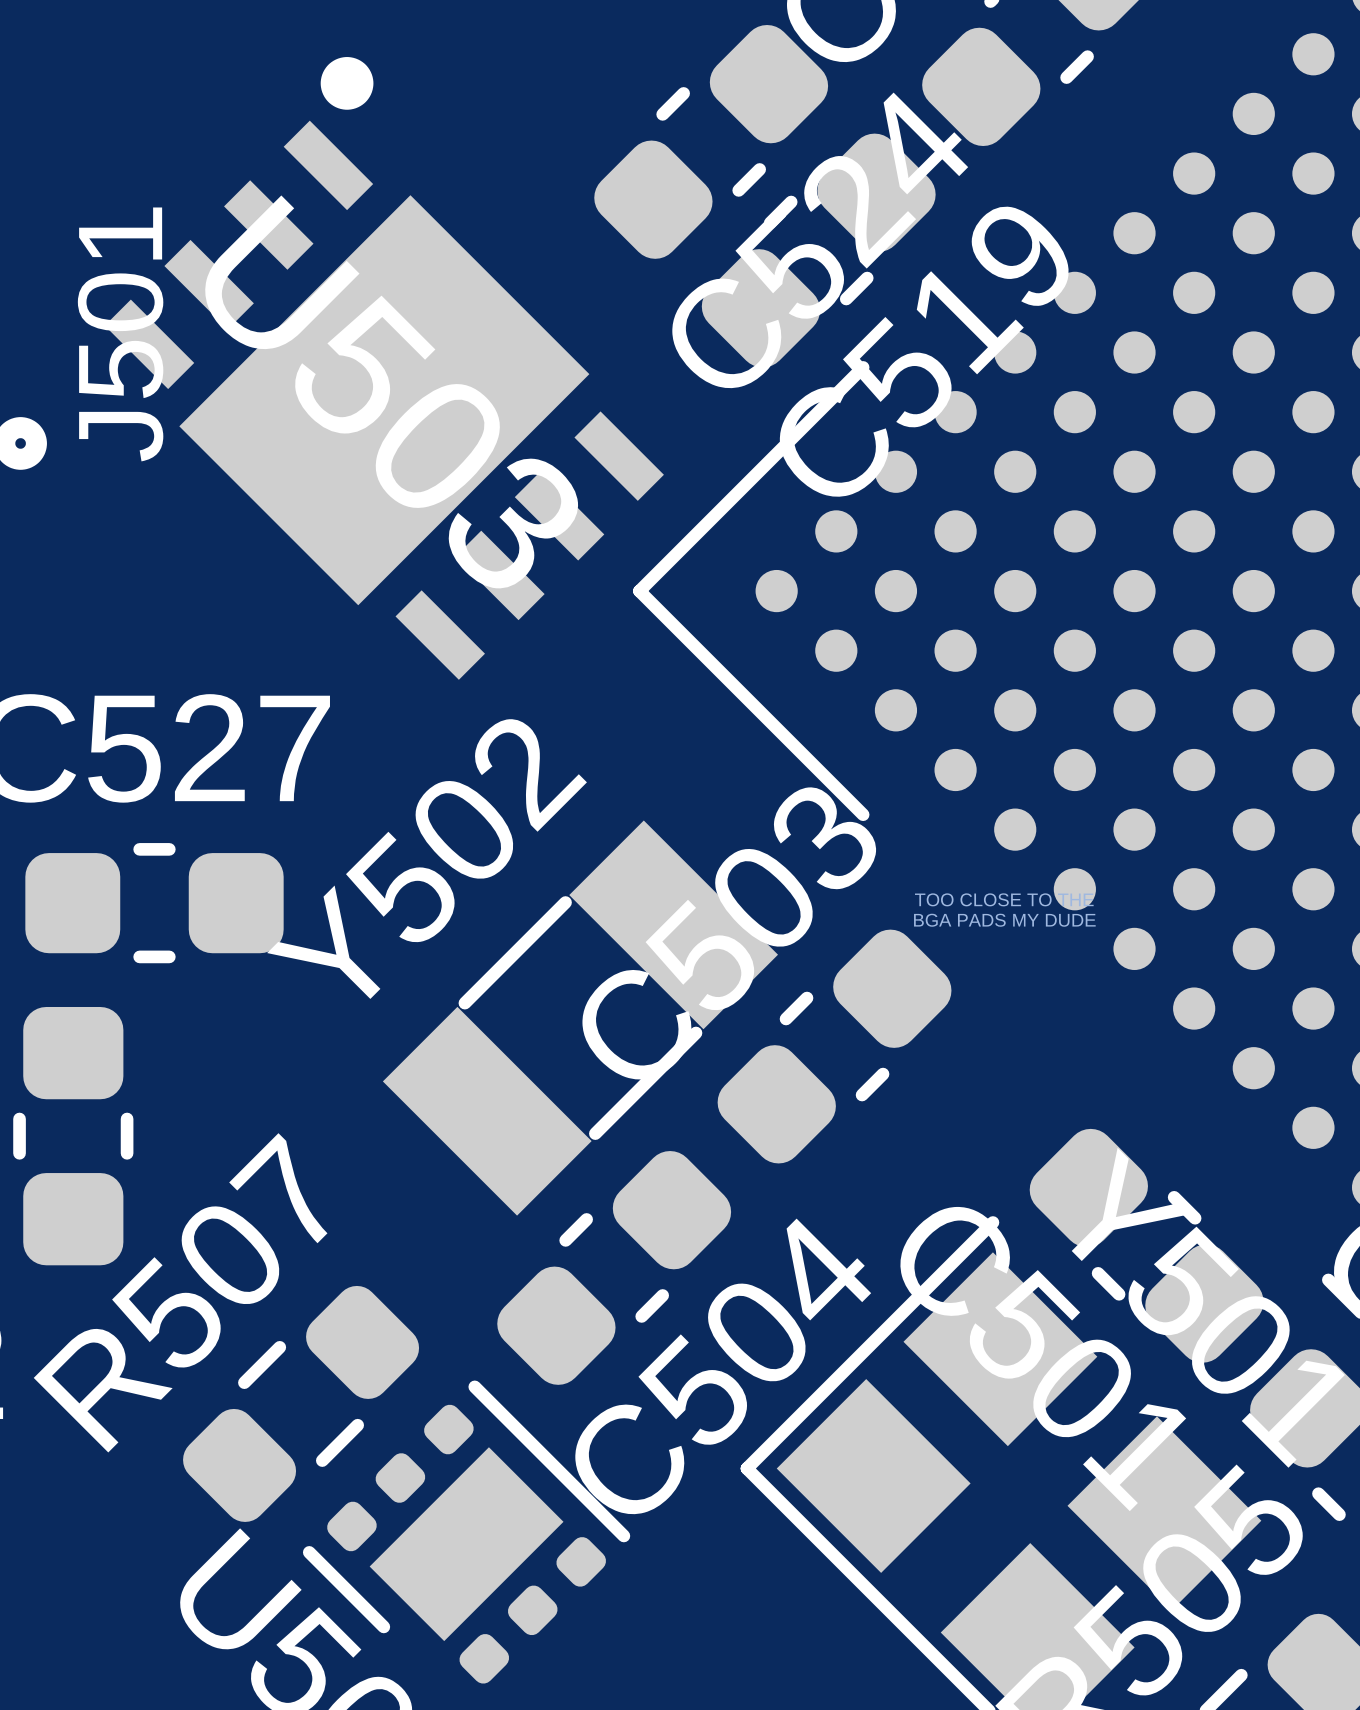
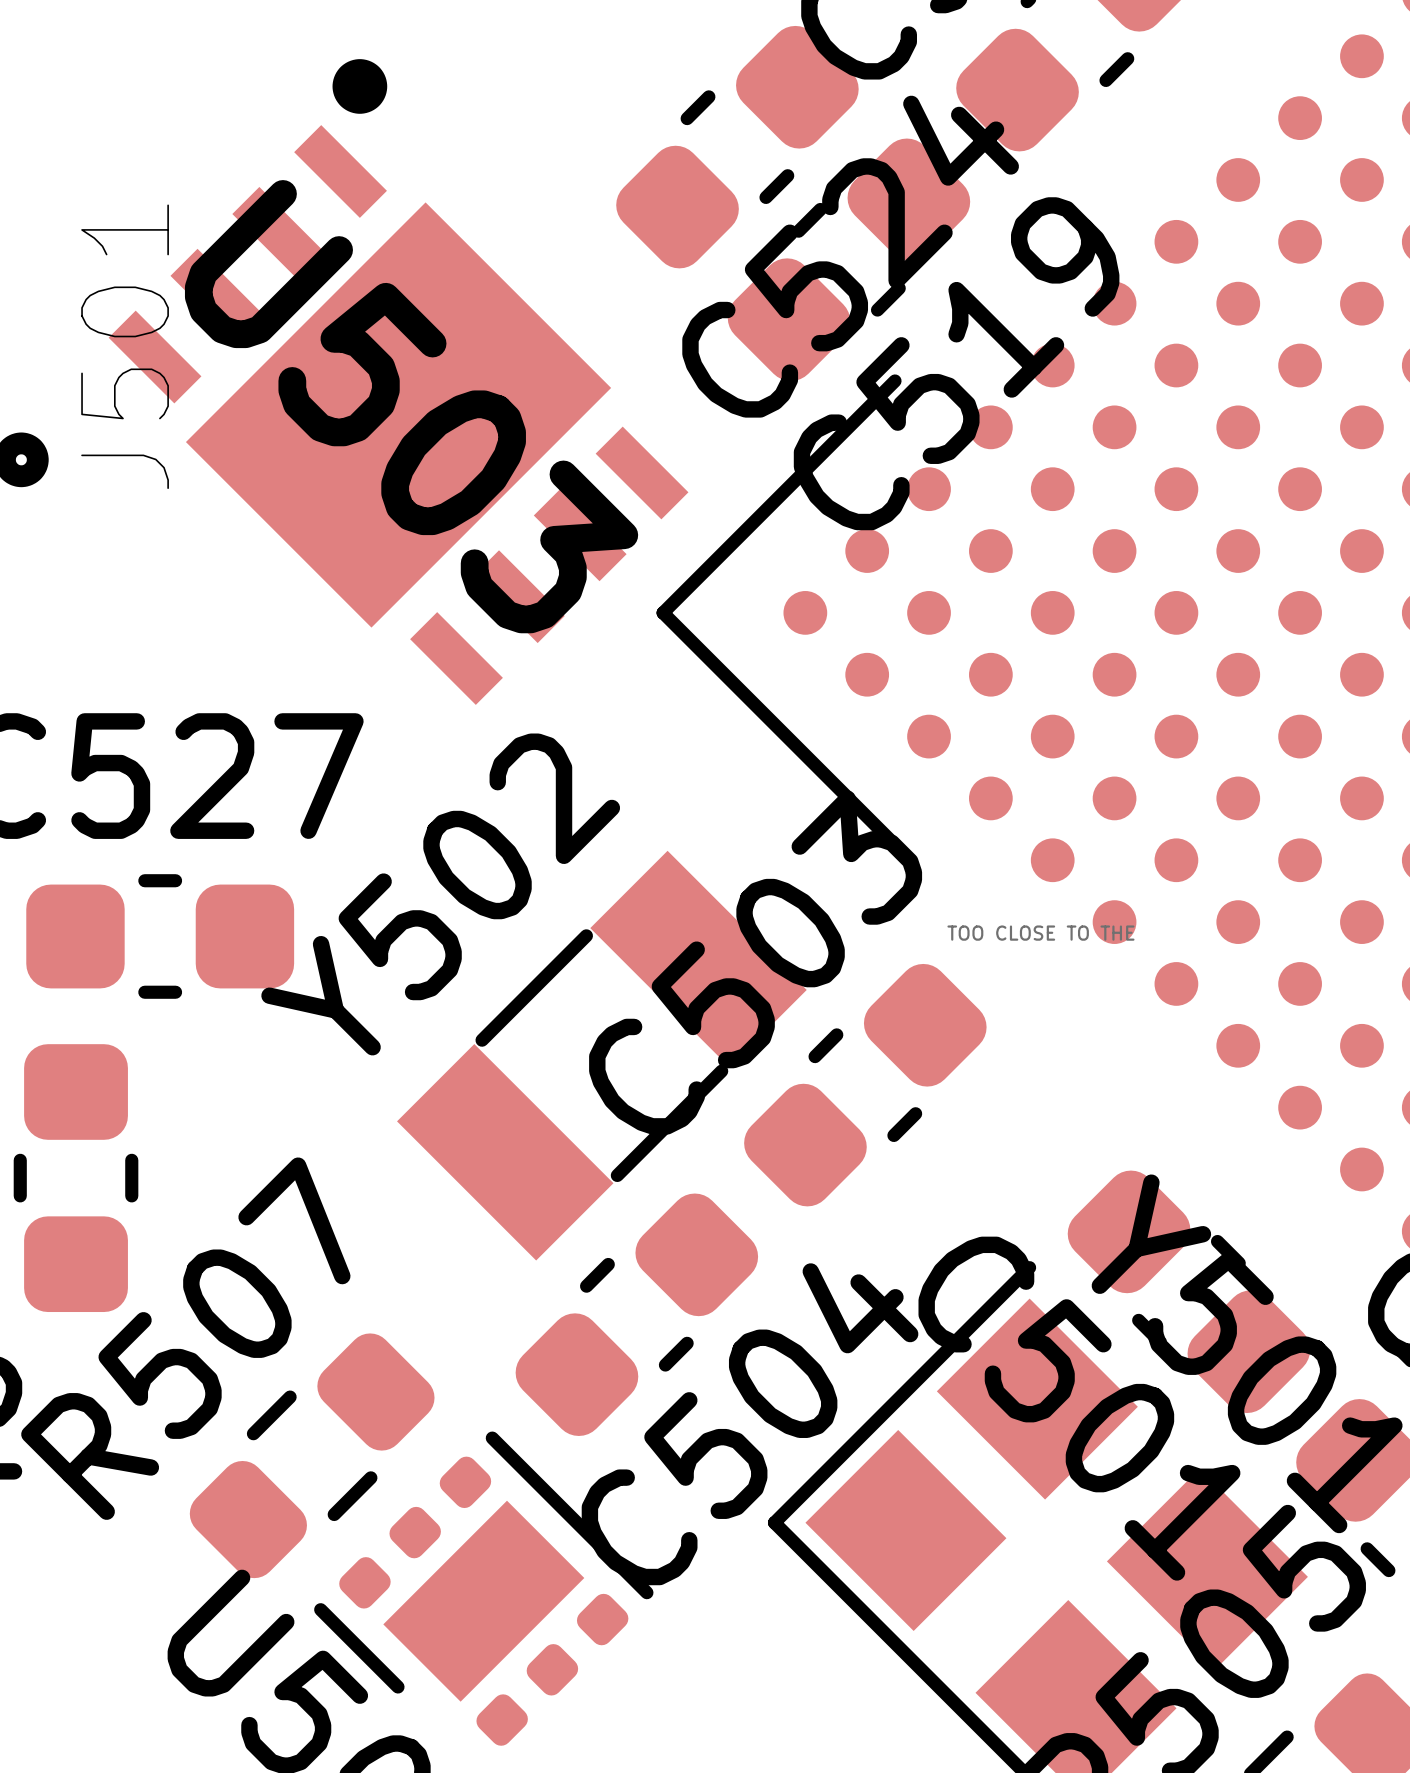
text: BGA PADS MY DUDE (1004, 920) -> none

